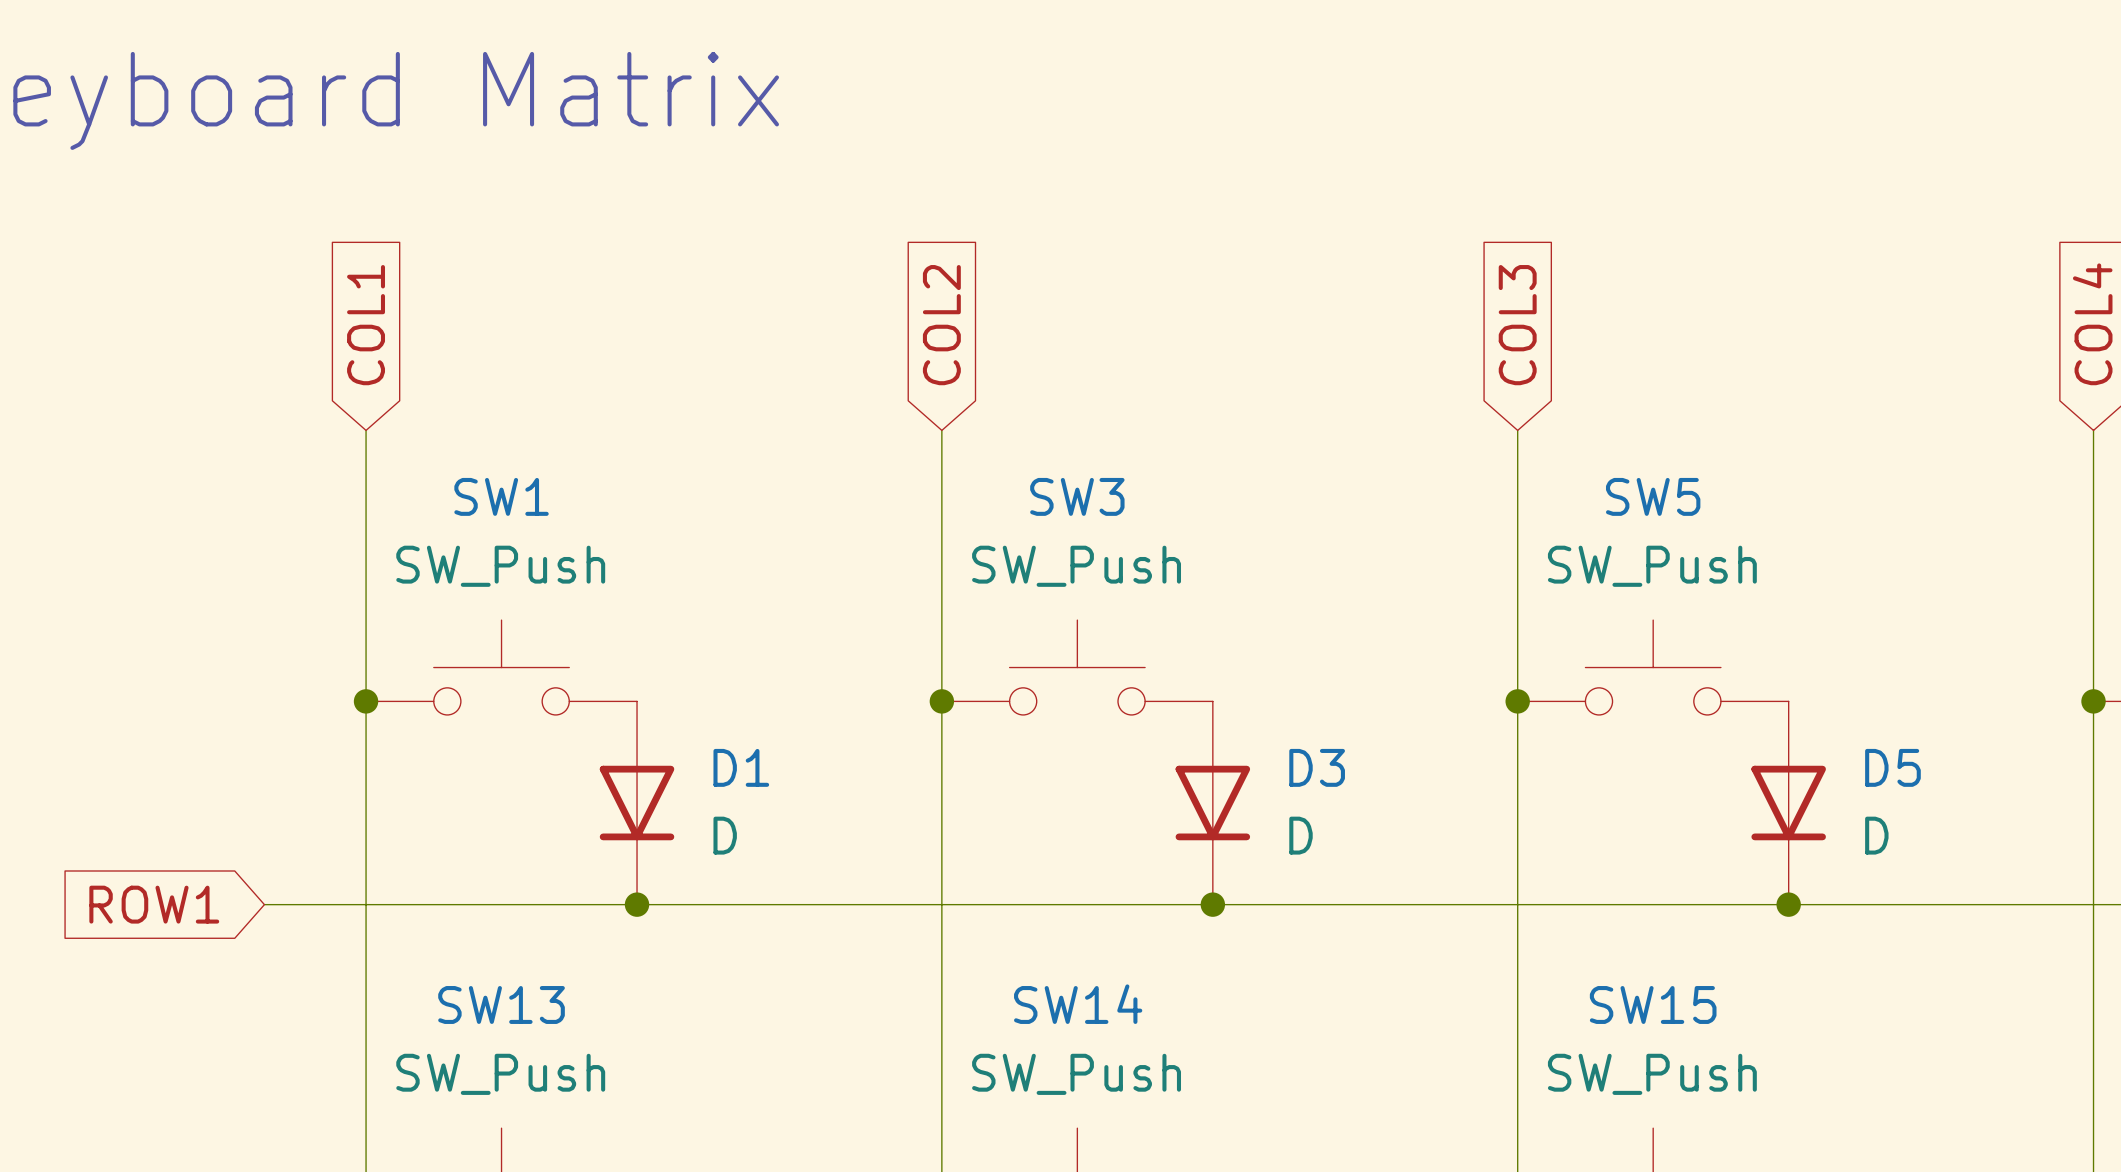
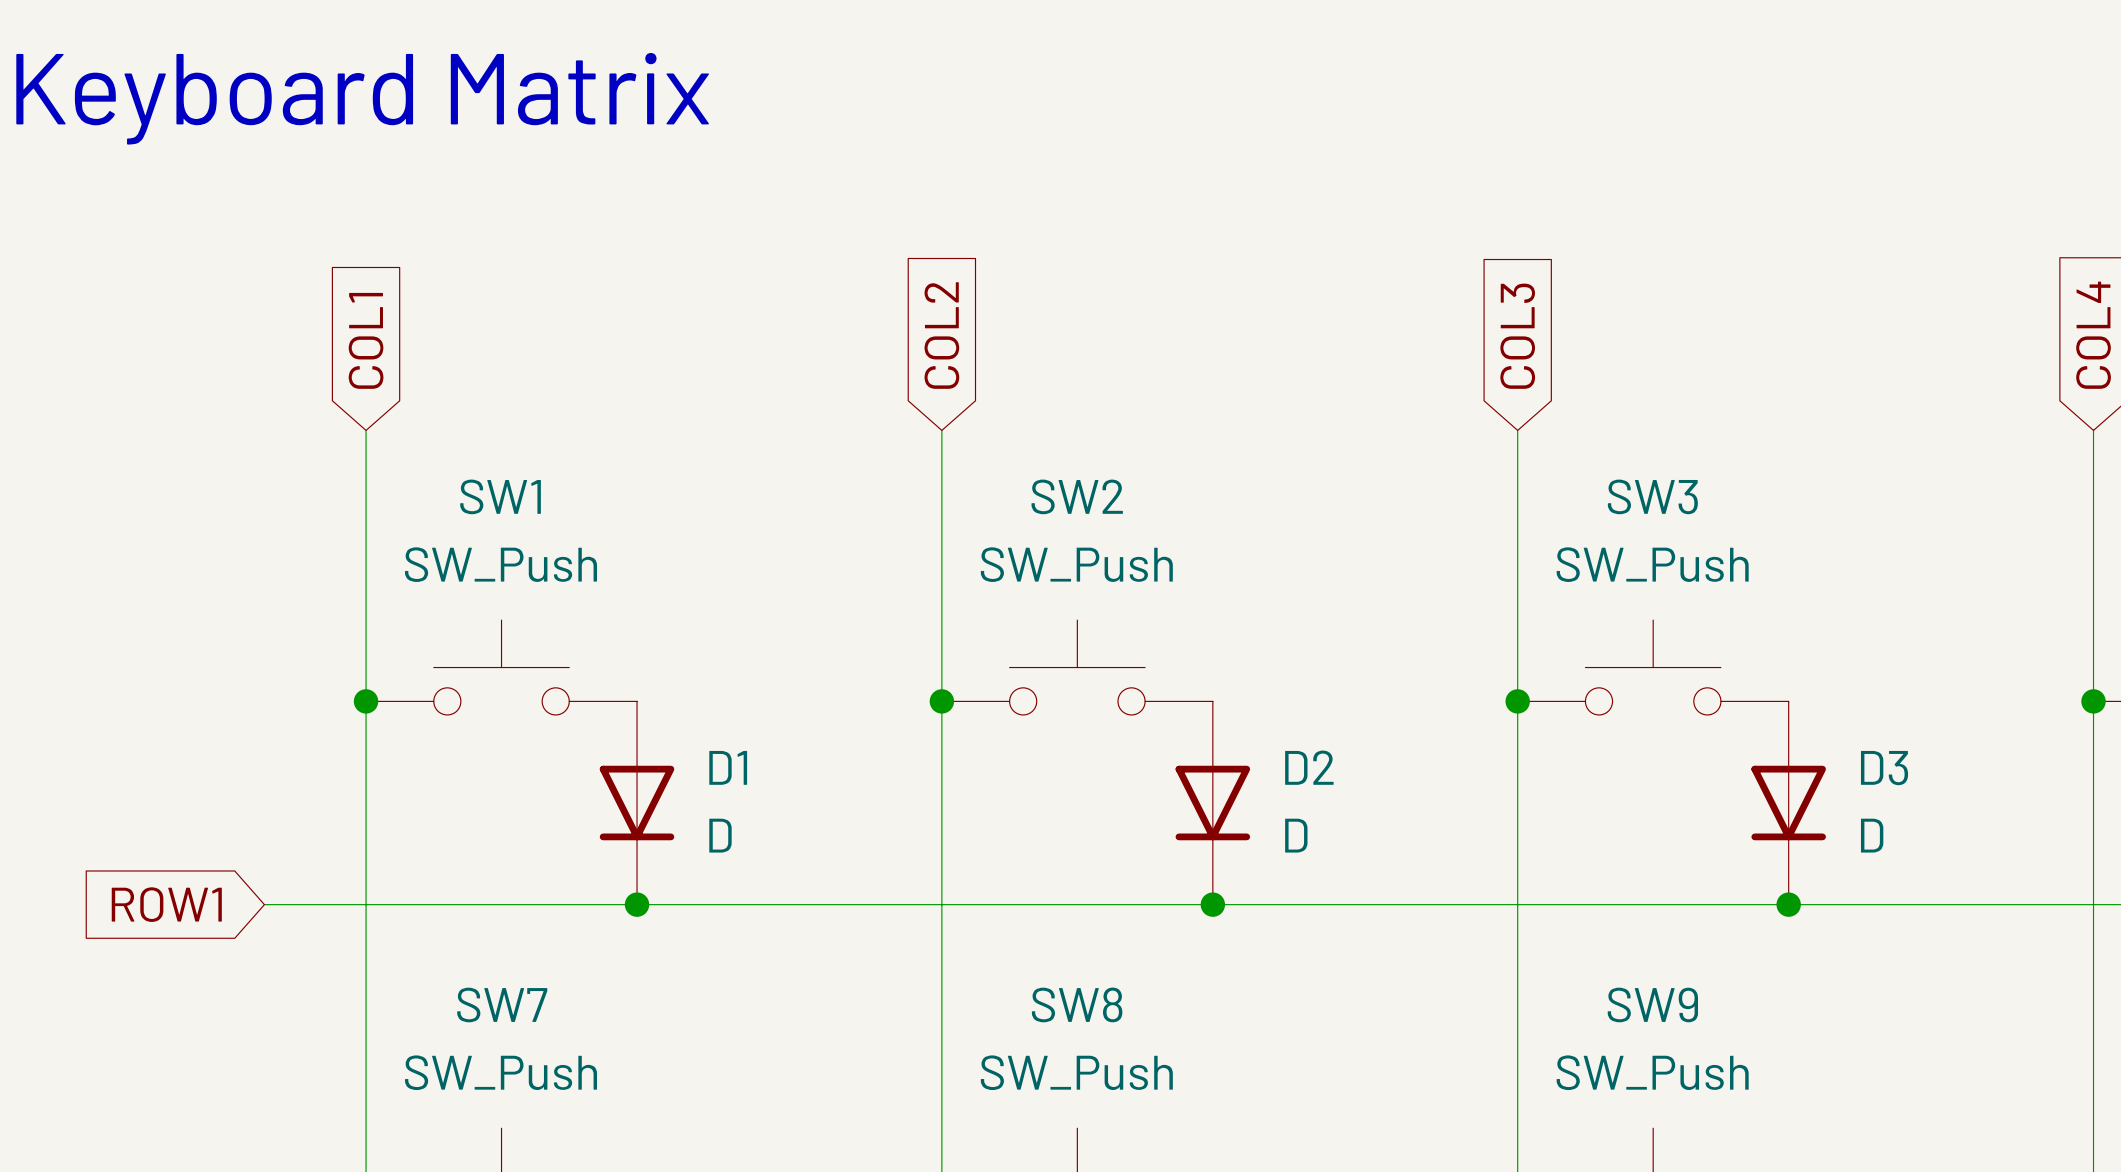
SW3 name: SW3 (1077, 496) -> SW2 (1077, 496)
SW5 name: SW5 (1653, 496) -> SW3 (1652, 496)
D3 name: D3 (1317, 767) -> D2 (1309, 767)
D5 name: D5 (1892, 767) -> D3 (1884, 768)
SW13 name: SW13 (501, 1004) -> SW7 (502, 1004)
SW14 name: SW14 (1078, 1004) -> SW8 (1077, 1004)
SW15 name: SW15 (1653, 1004) -> SW9 (1652, 1004)

